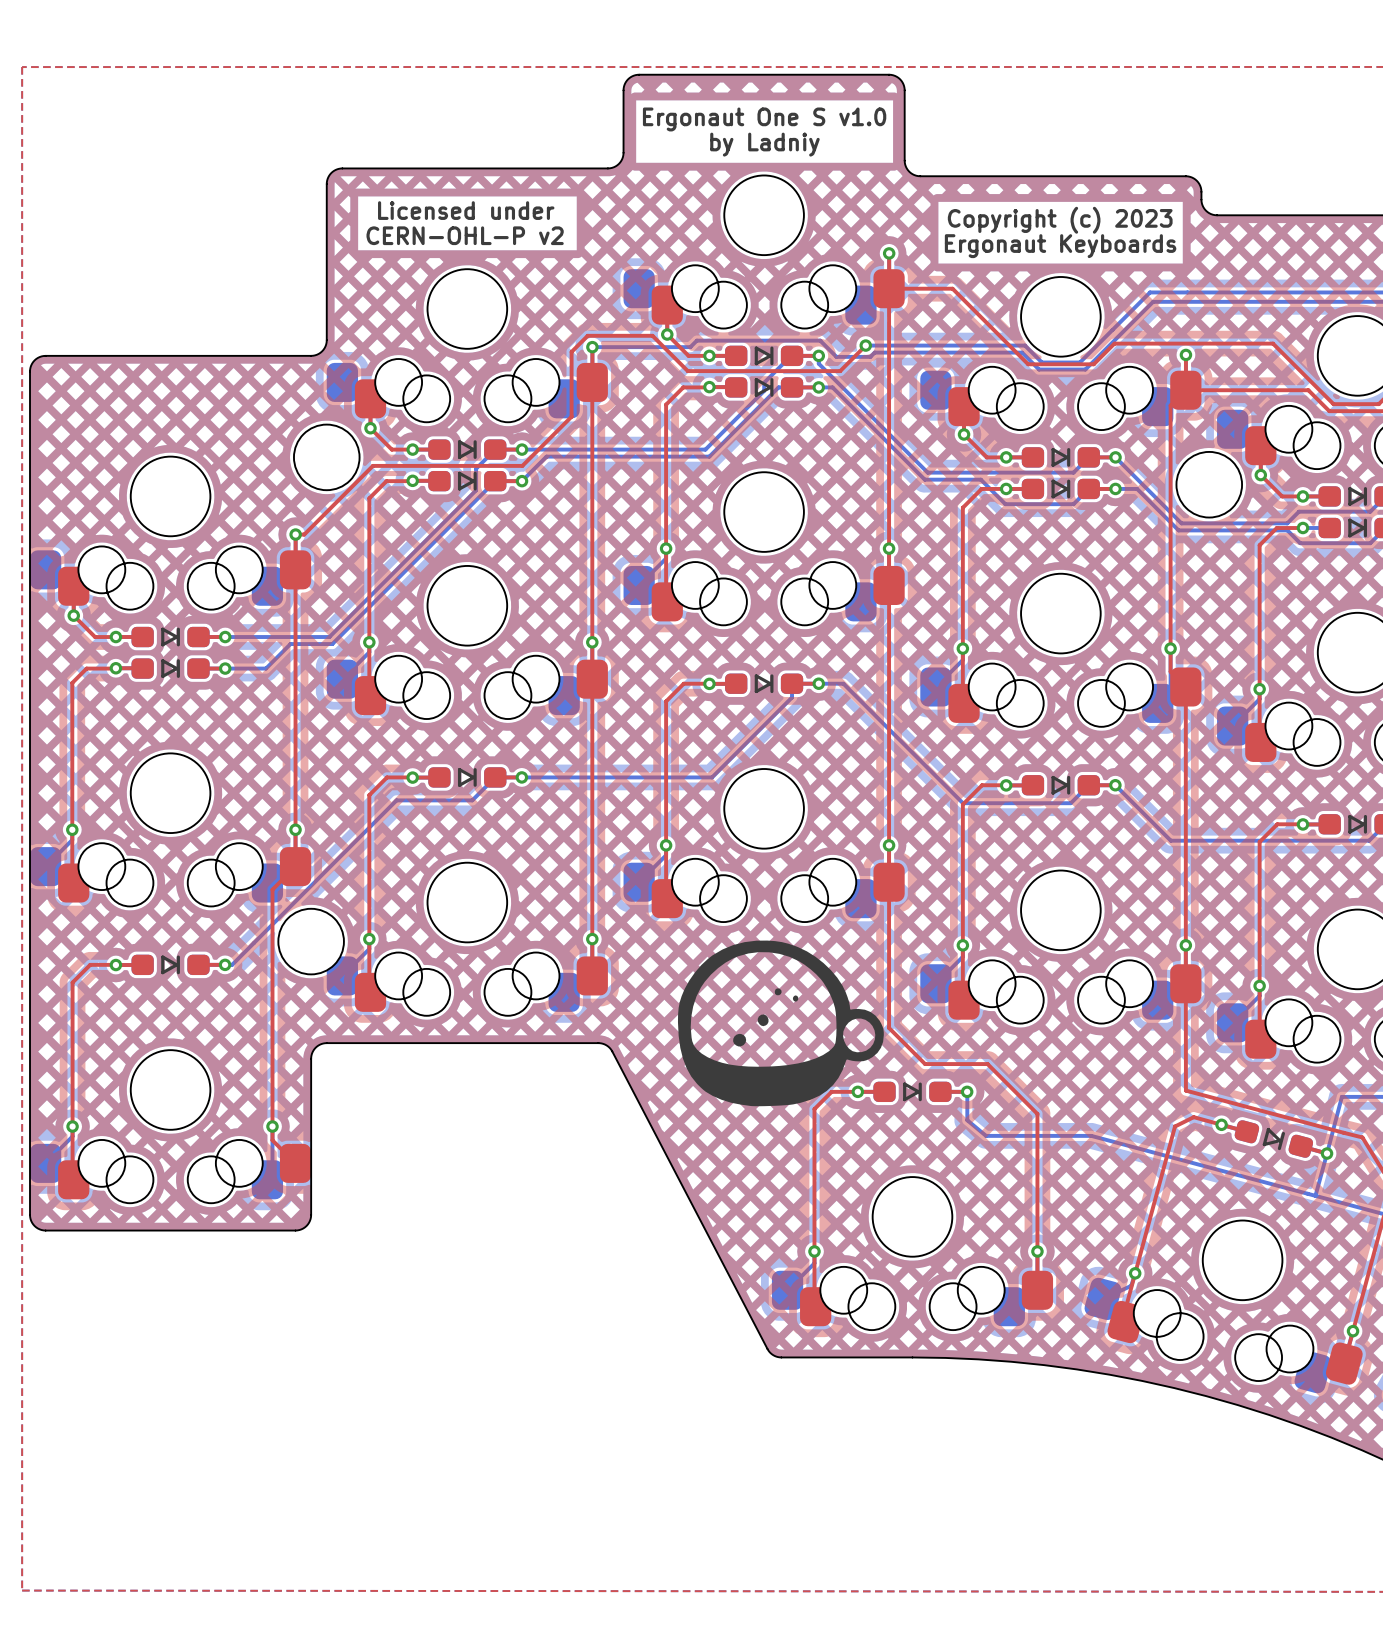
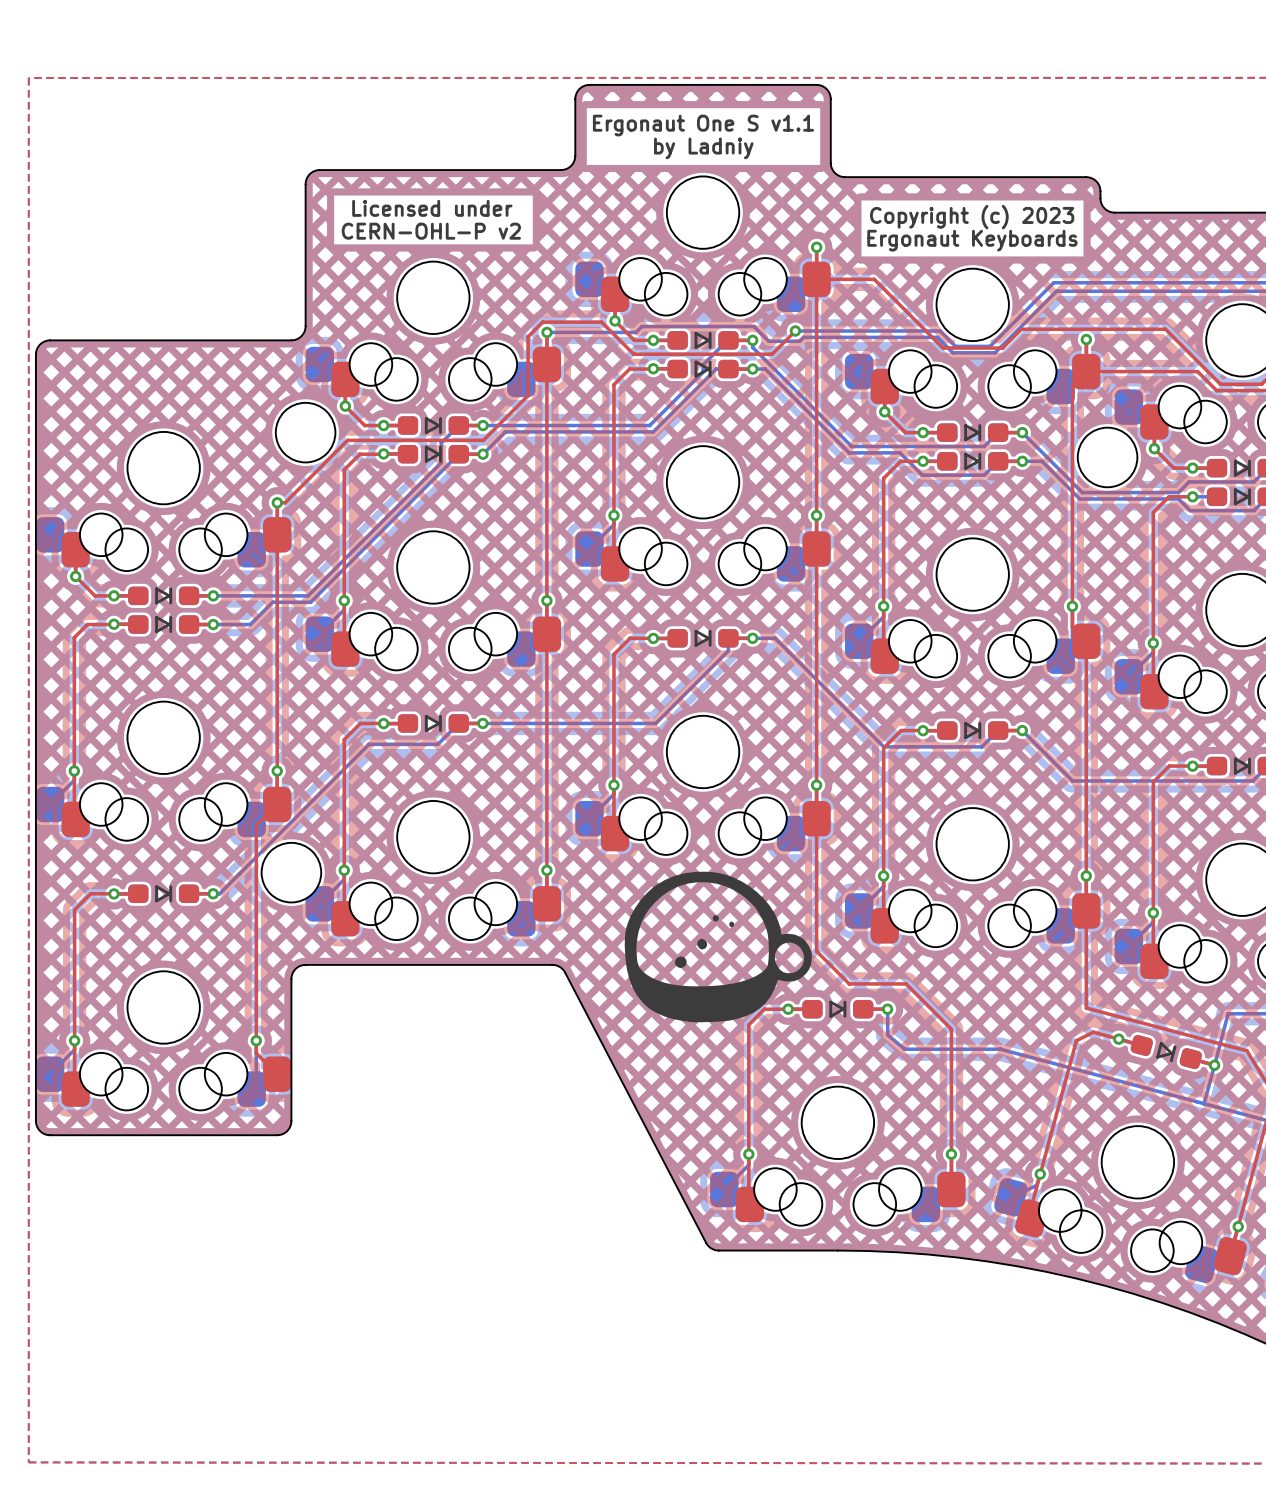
text: Ergonaut One S v1.0 (764, 119) -> Ergonaut One S v1.1 (703, 125)

